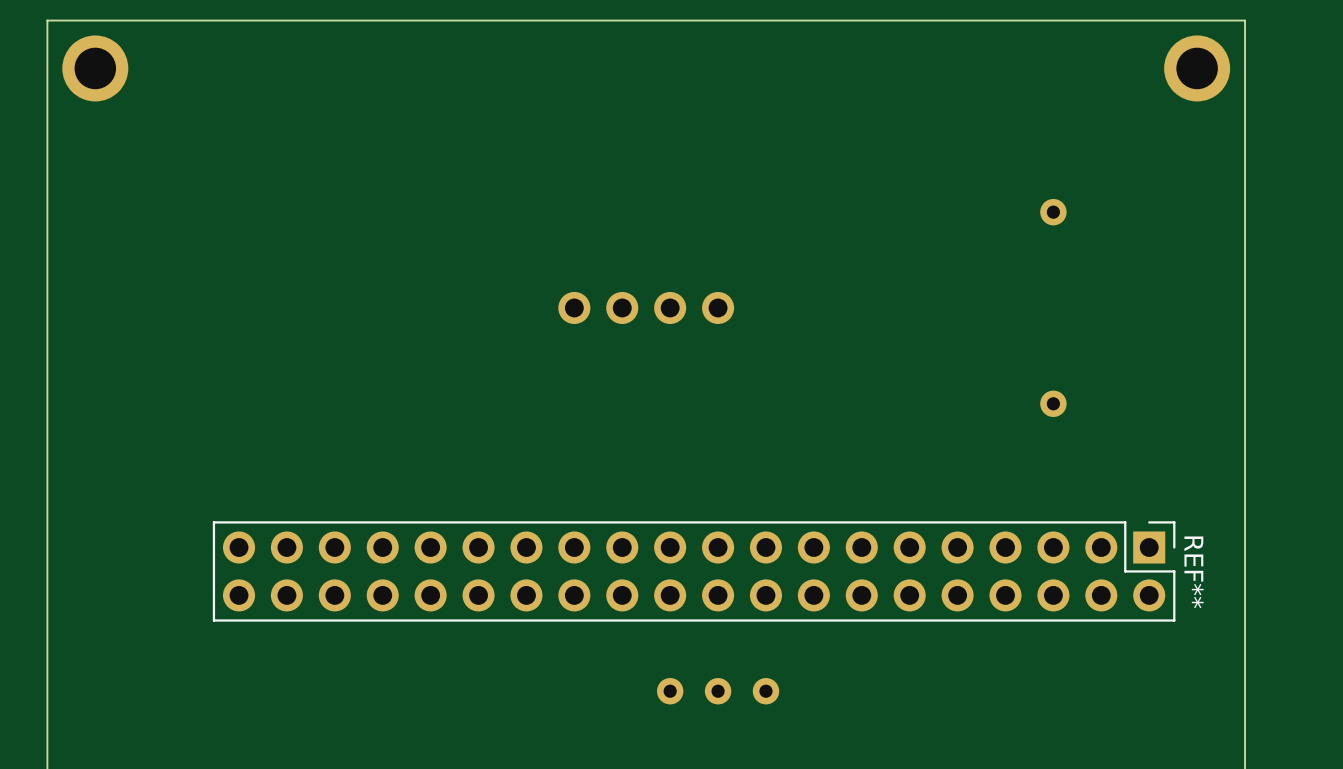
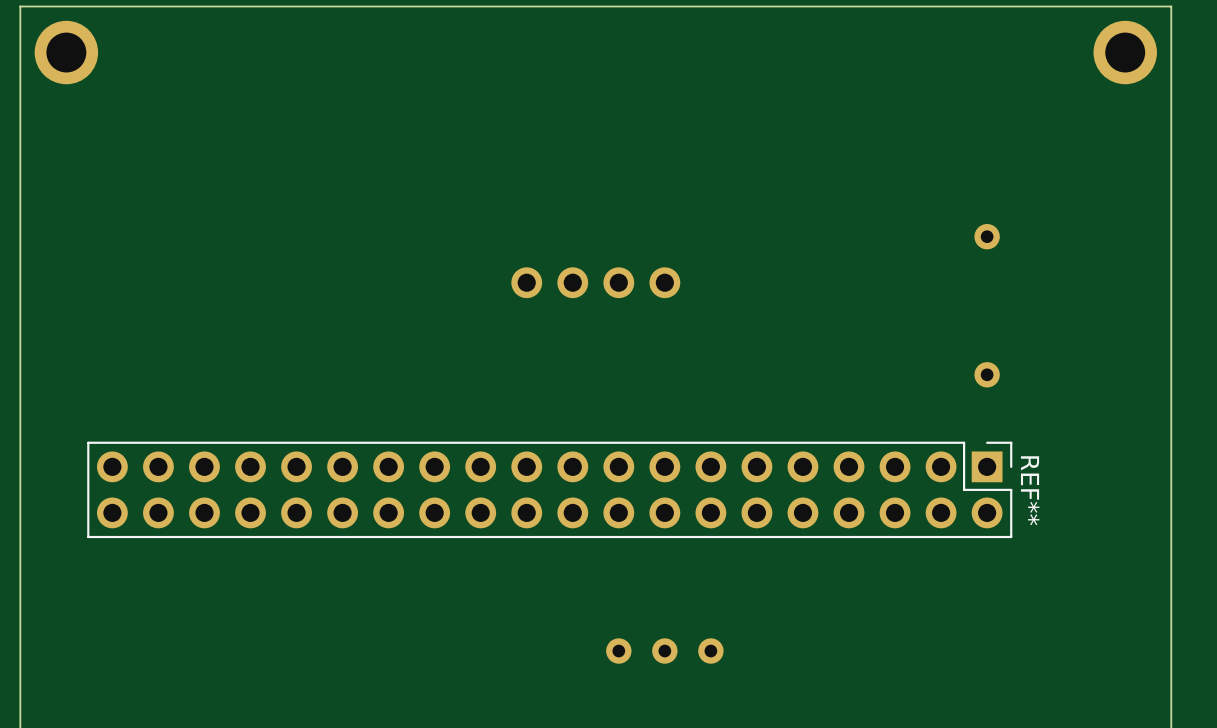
part position: (1053, 212) -> (987, 236)
REF** position: (694, 571) -> (549, 489)

